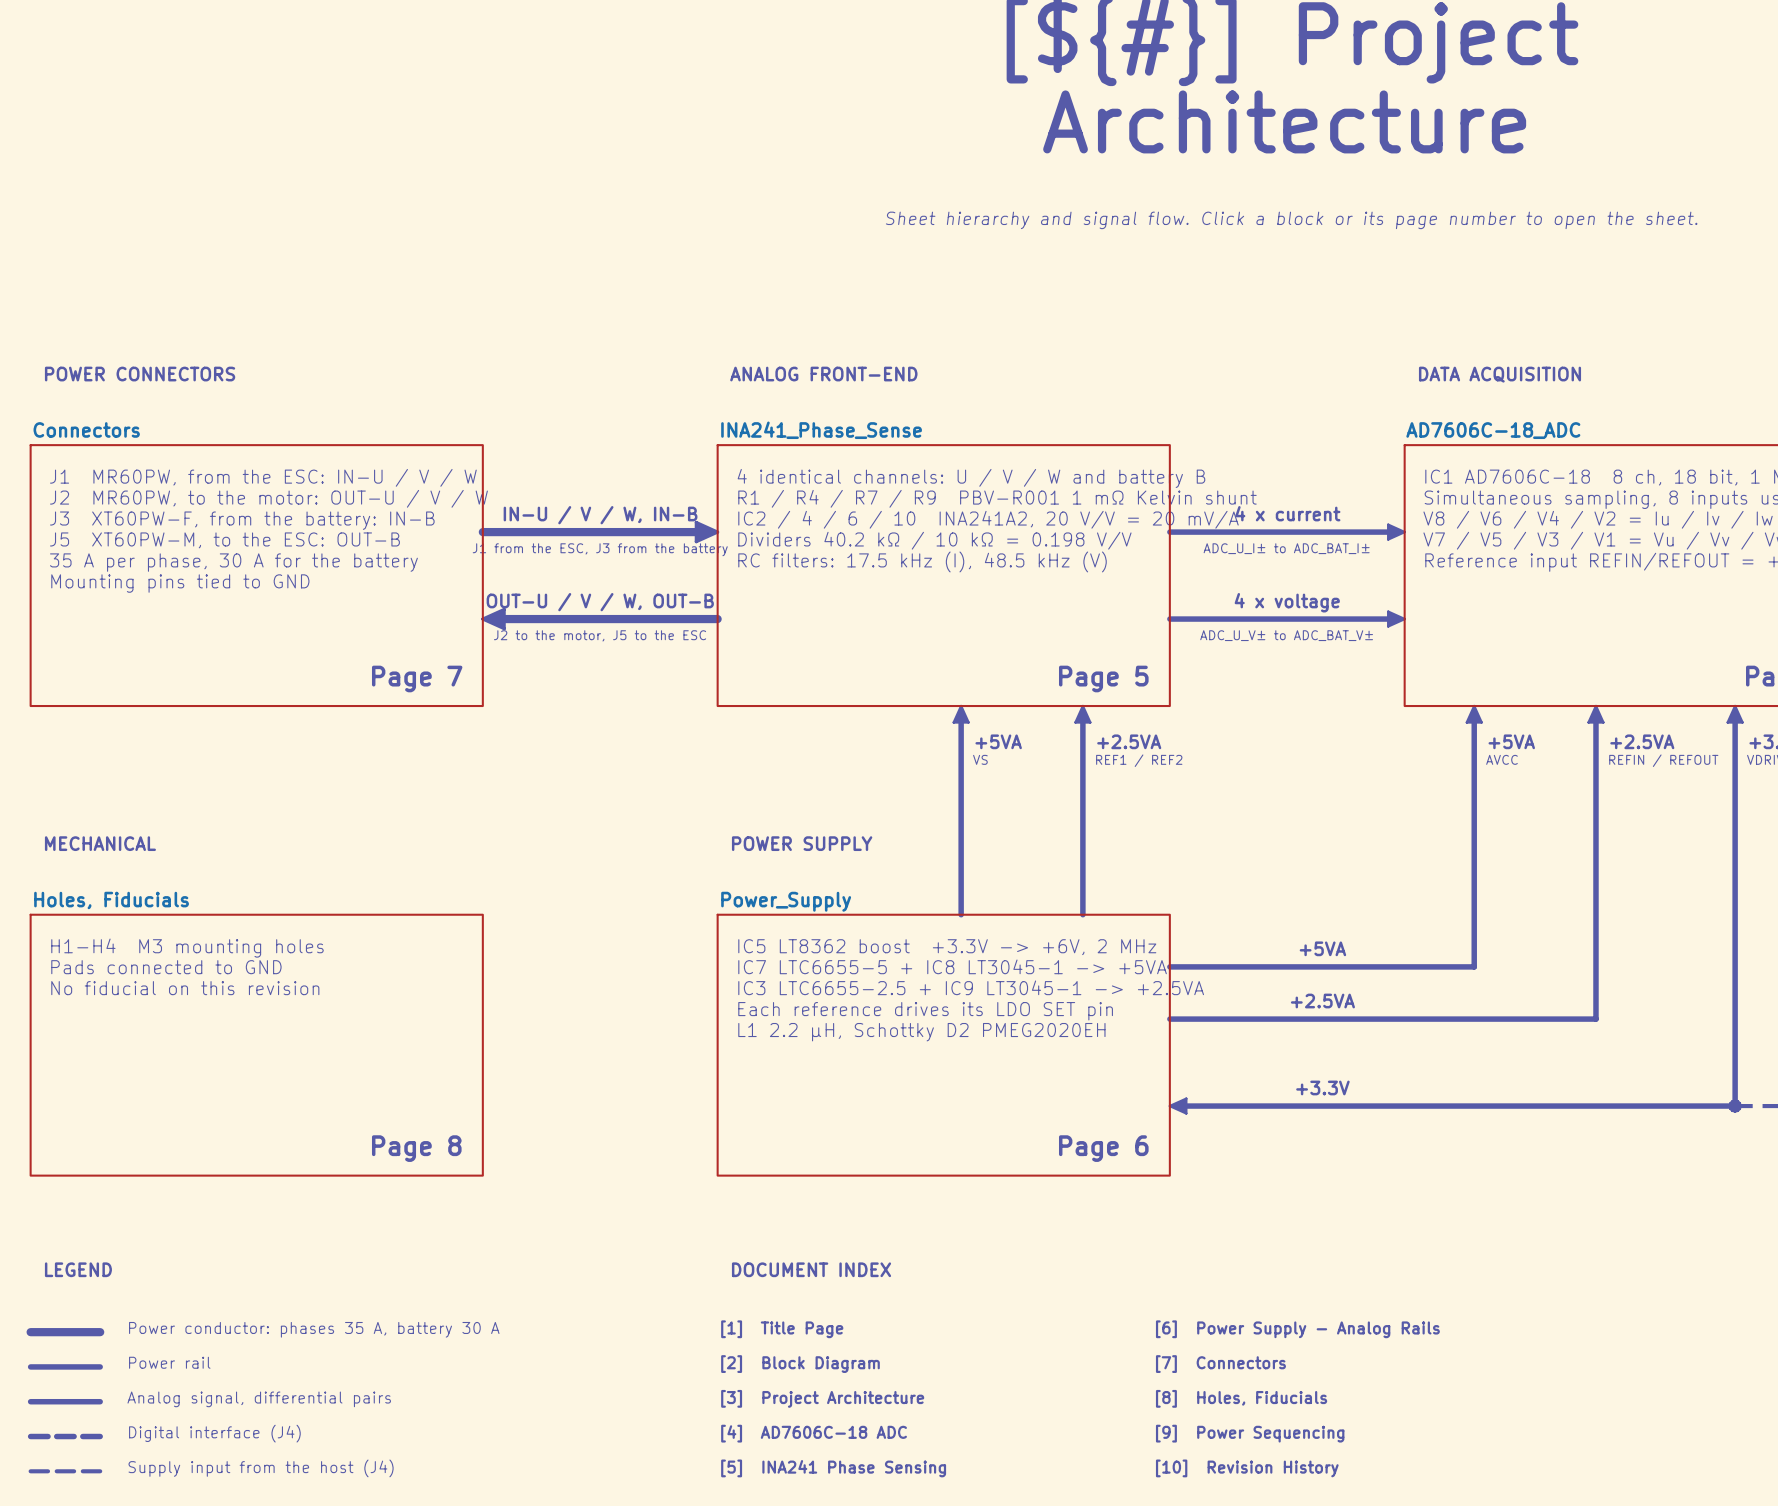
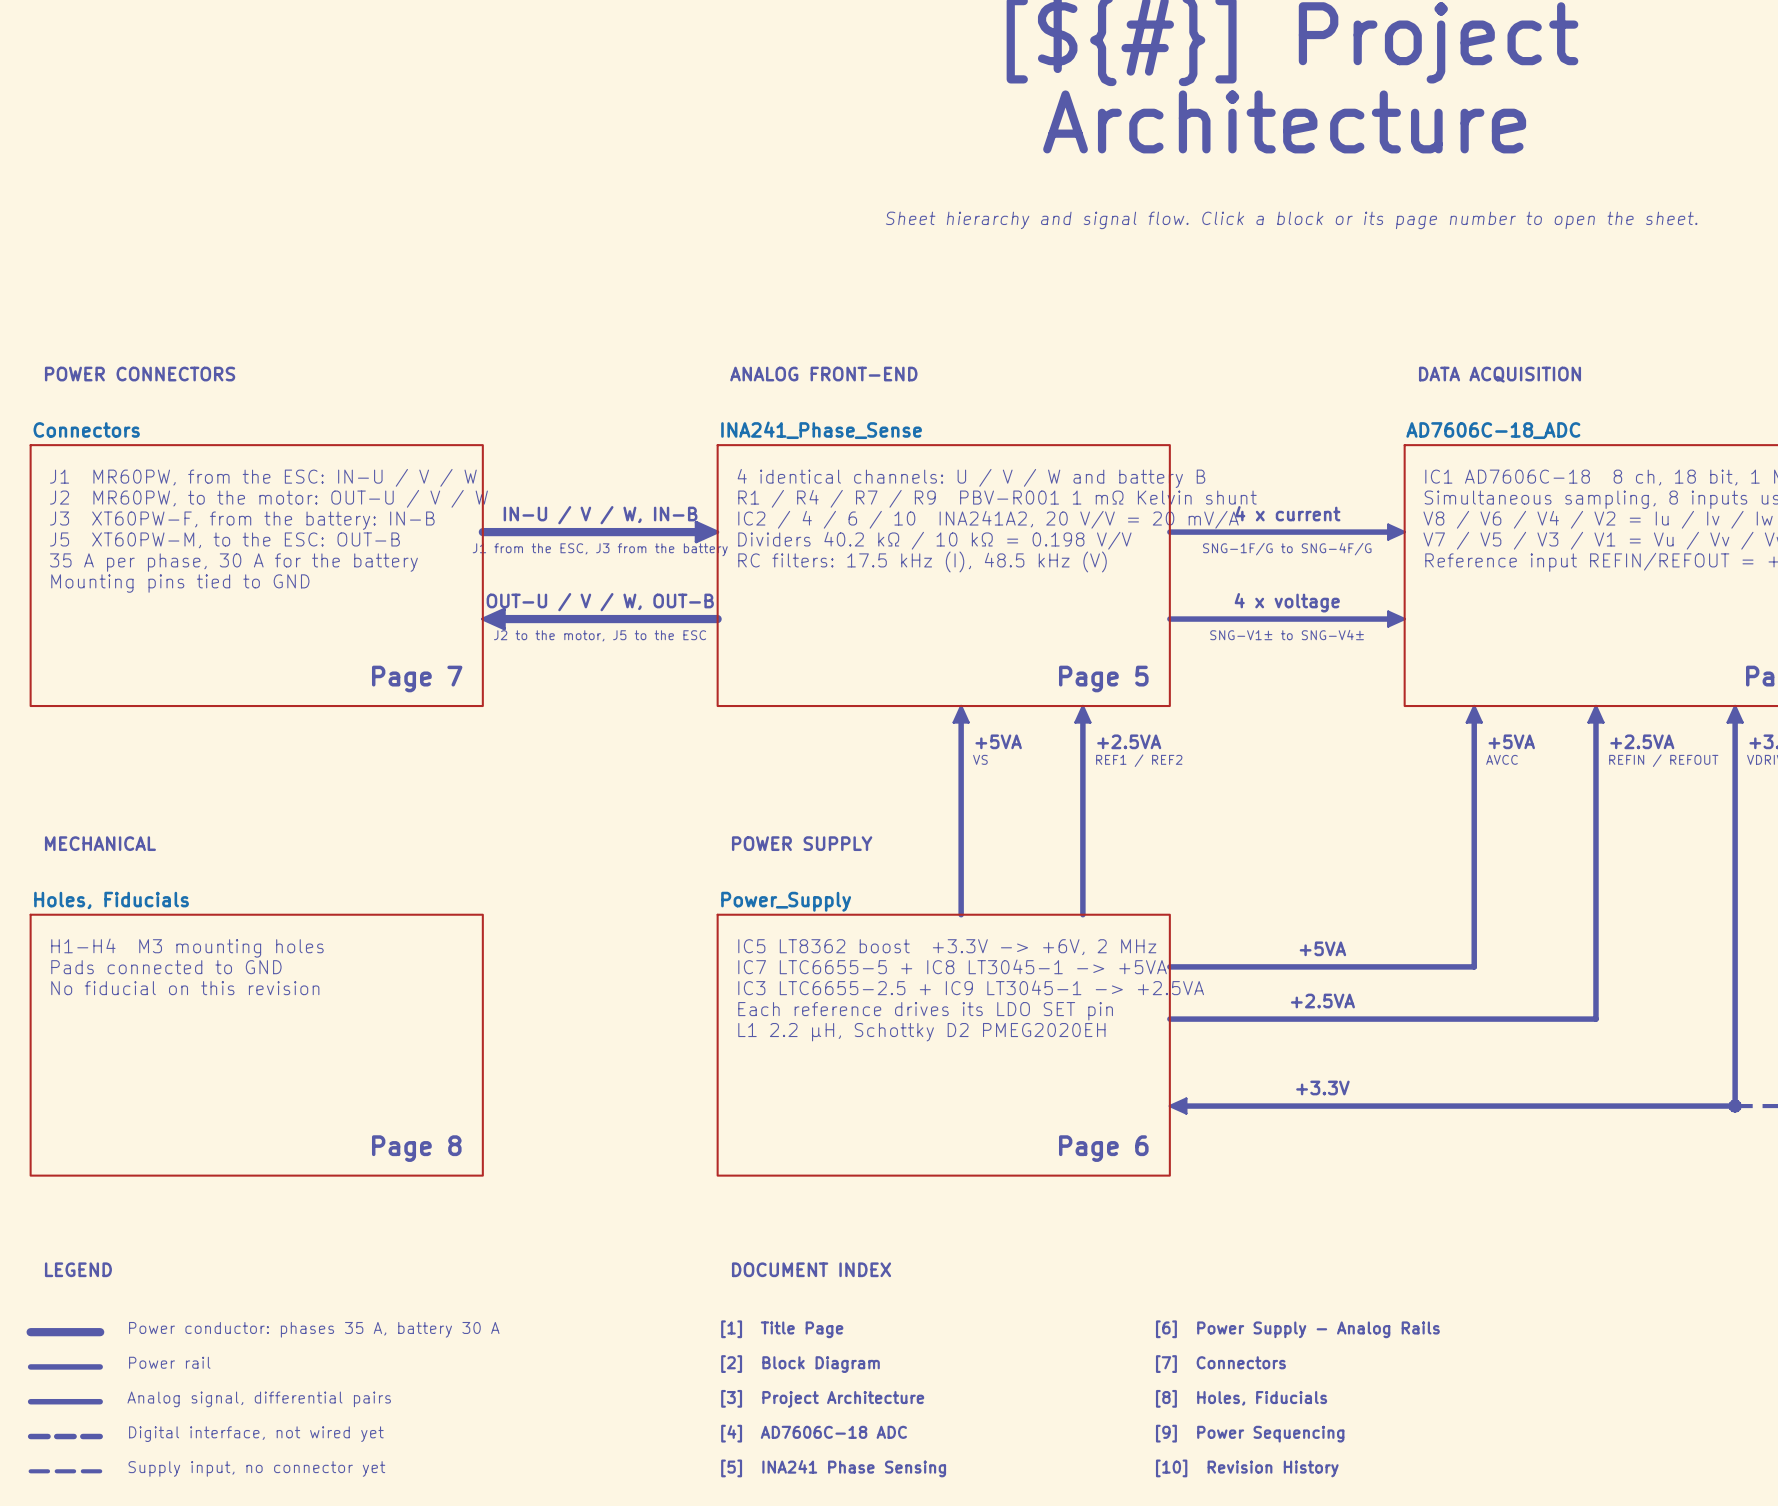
text: ADC_U_I± to ADC_BAT_I± (1286, 548) -> SNG-1F/G to SNG-4F/G (1287, 549)
text: ADC_U_V± to ADC_BAT_V± (1286, 635) -> SNG-V1± to SNG-V4± (1287, 635)
text: Digital interface (J4) (214, 1433) -> Digital interface, not wired yet (256, 1434)
text: Supply input from the host (J4) (261, 1468) -> Supply input, no connector yet (256, 1468)

